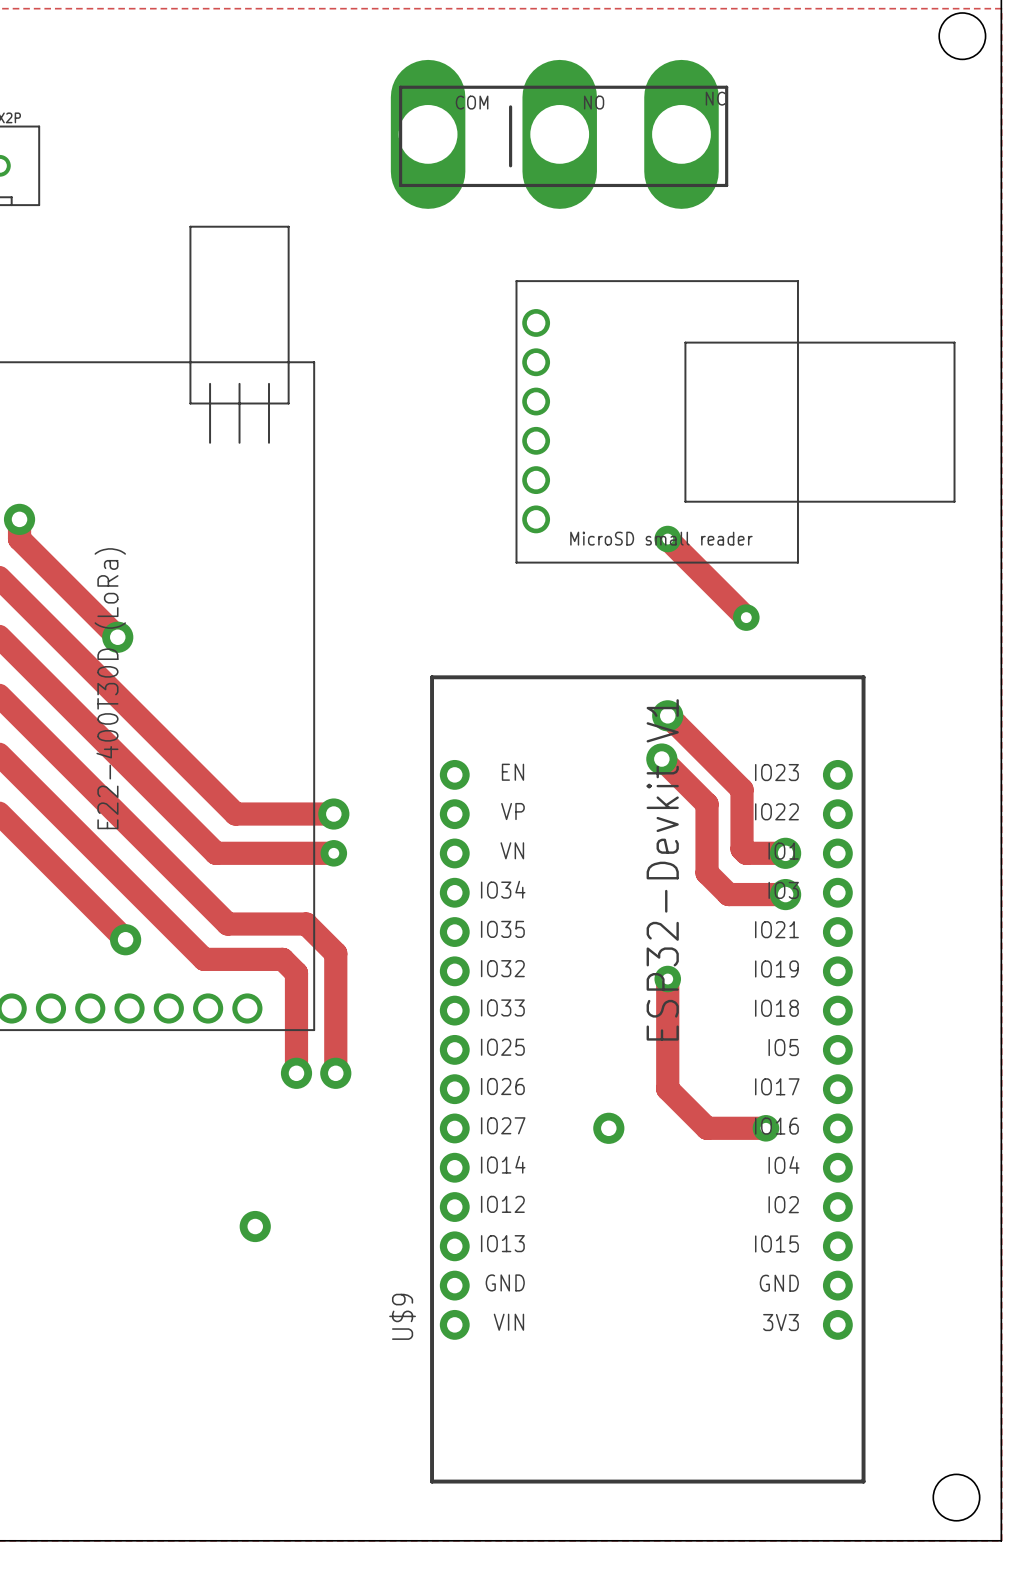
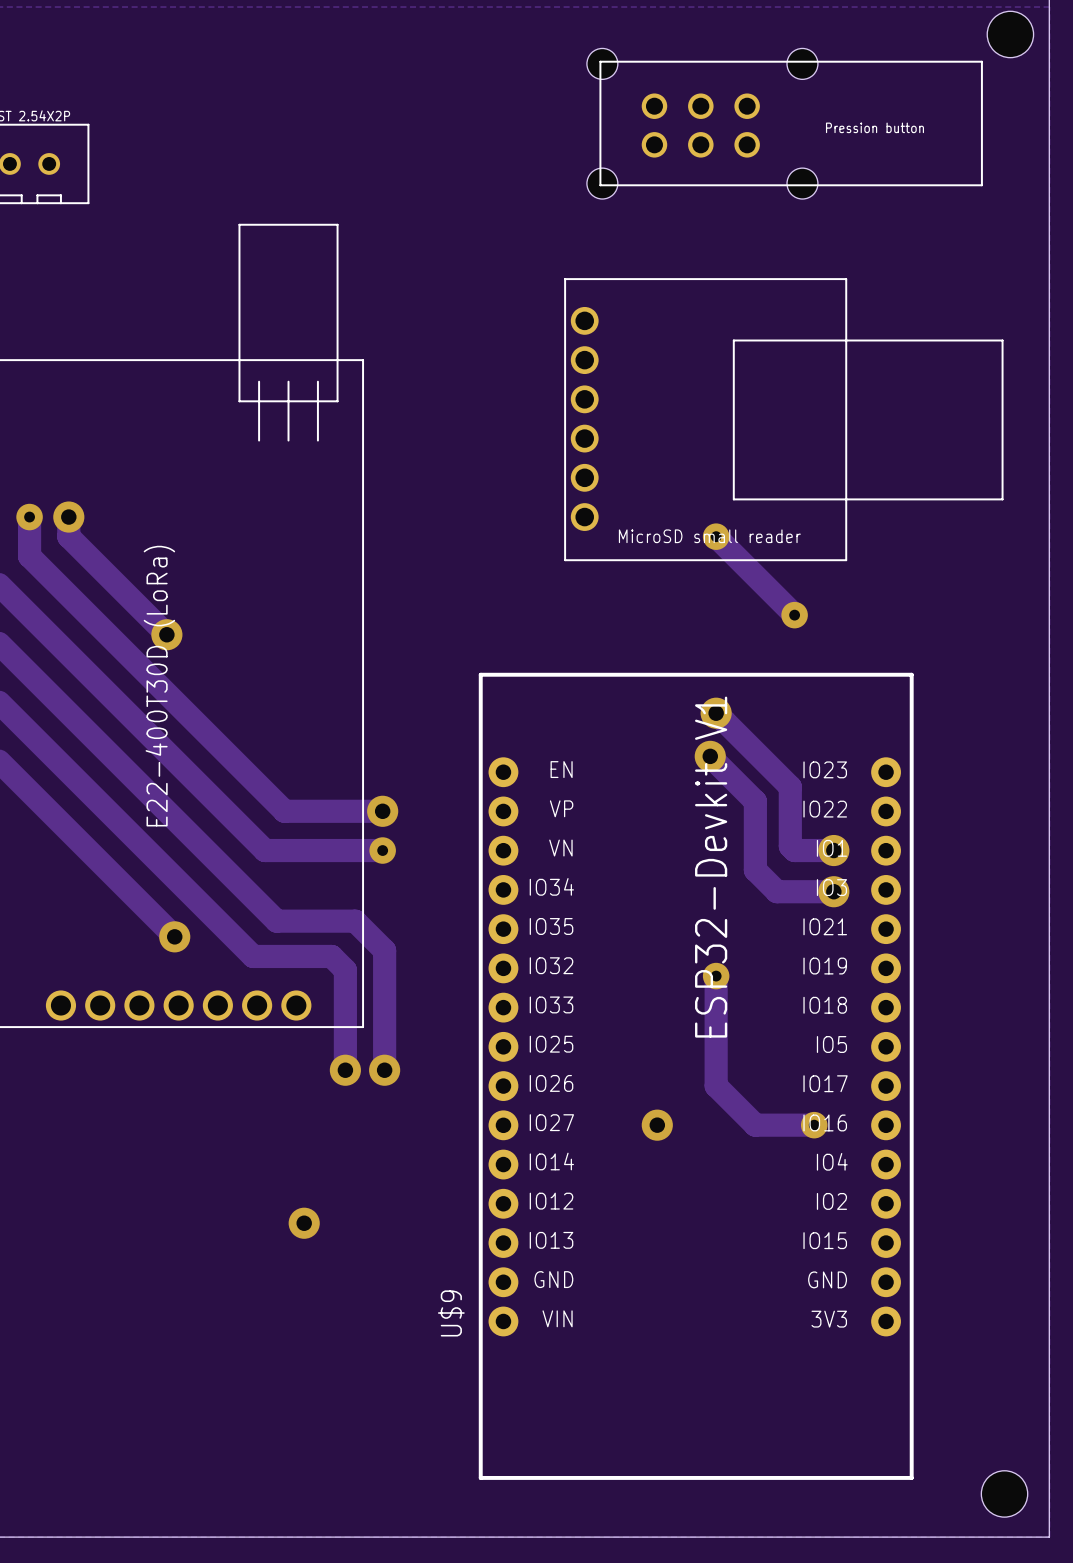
part: none -> (784, 123)
part: (559, 134) -> none

